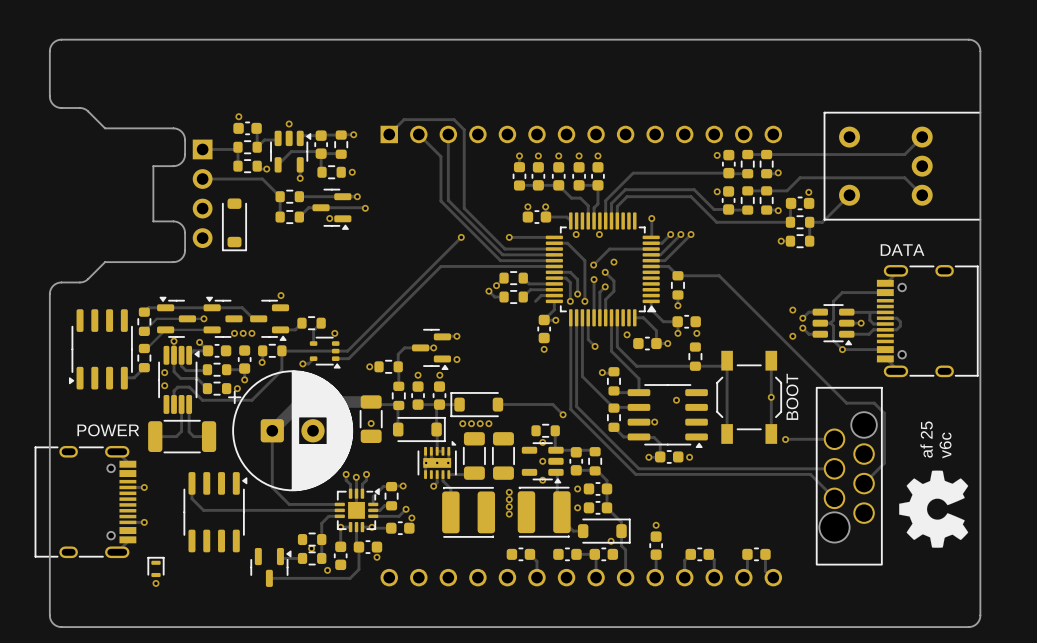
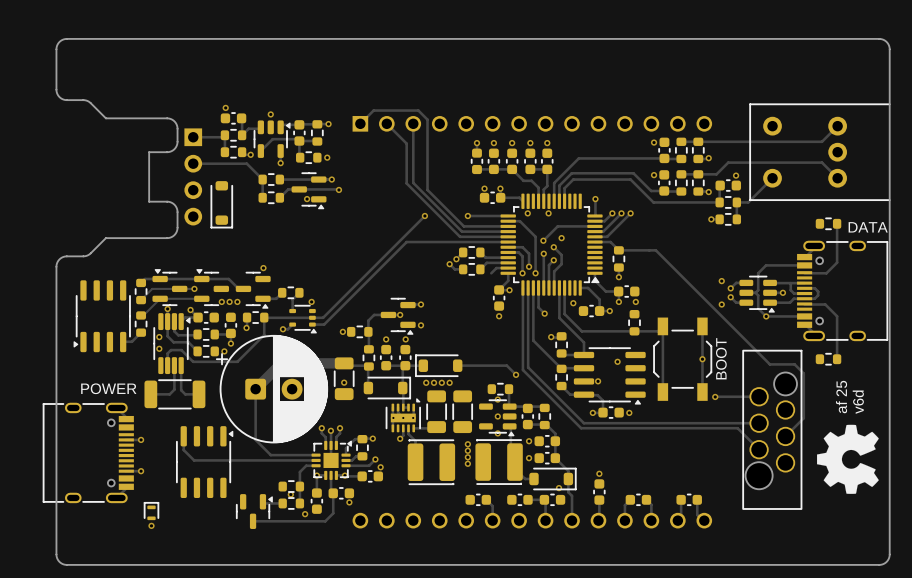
part: none -> (828, 223)
track: none -> (837, 223) (837, 262) (826, 273) (804, 273)
part value position: DATA (902, 250) -> DATA (868, 227)
track: none -> (804, 304) (825, 304) (837, 316) (837, 359)
part: none -> (828, 359)
text: v6c (945, 445) -> v6d (858, 402)

